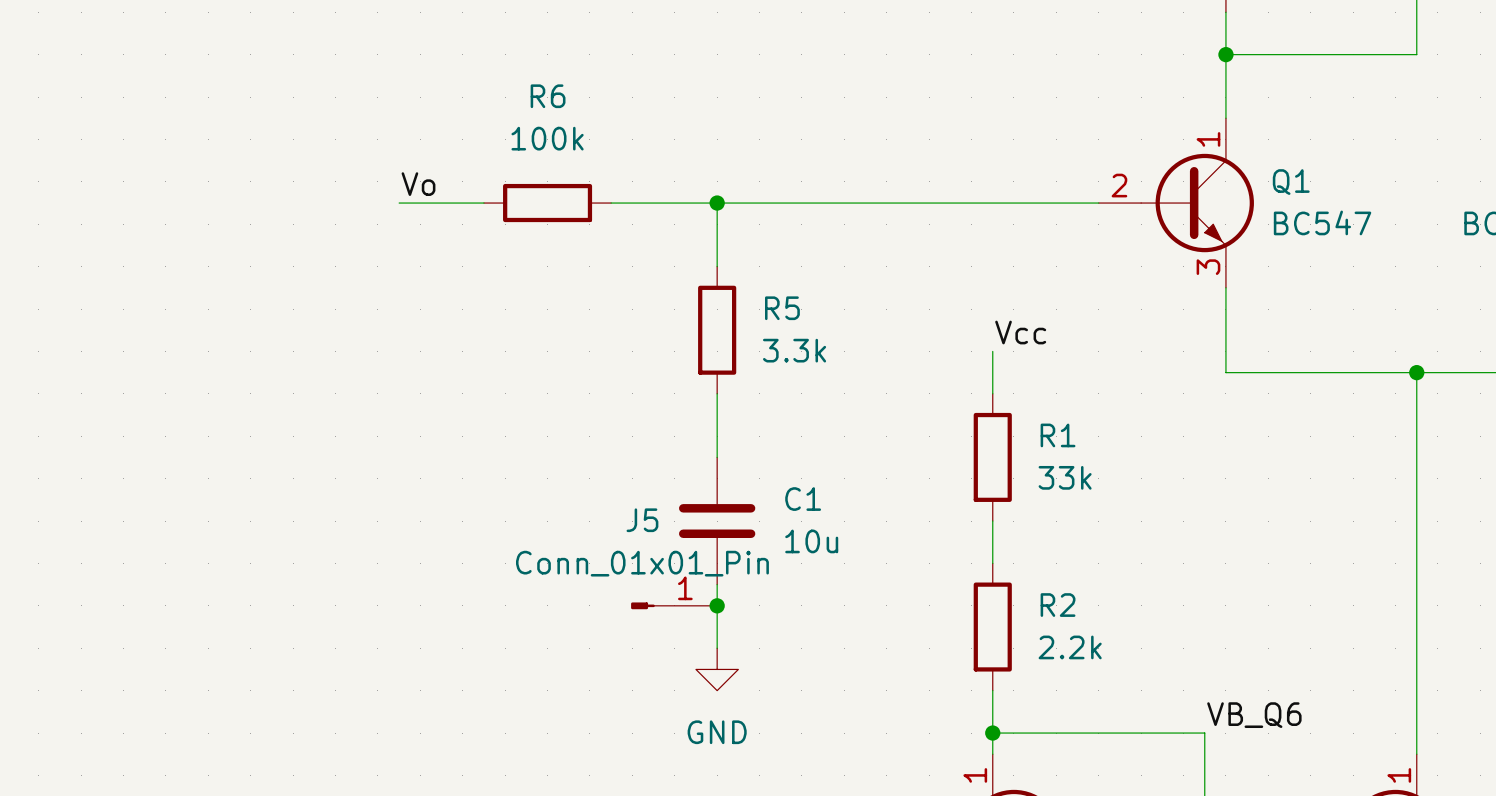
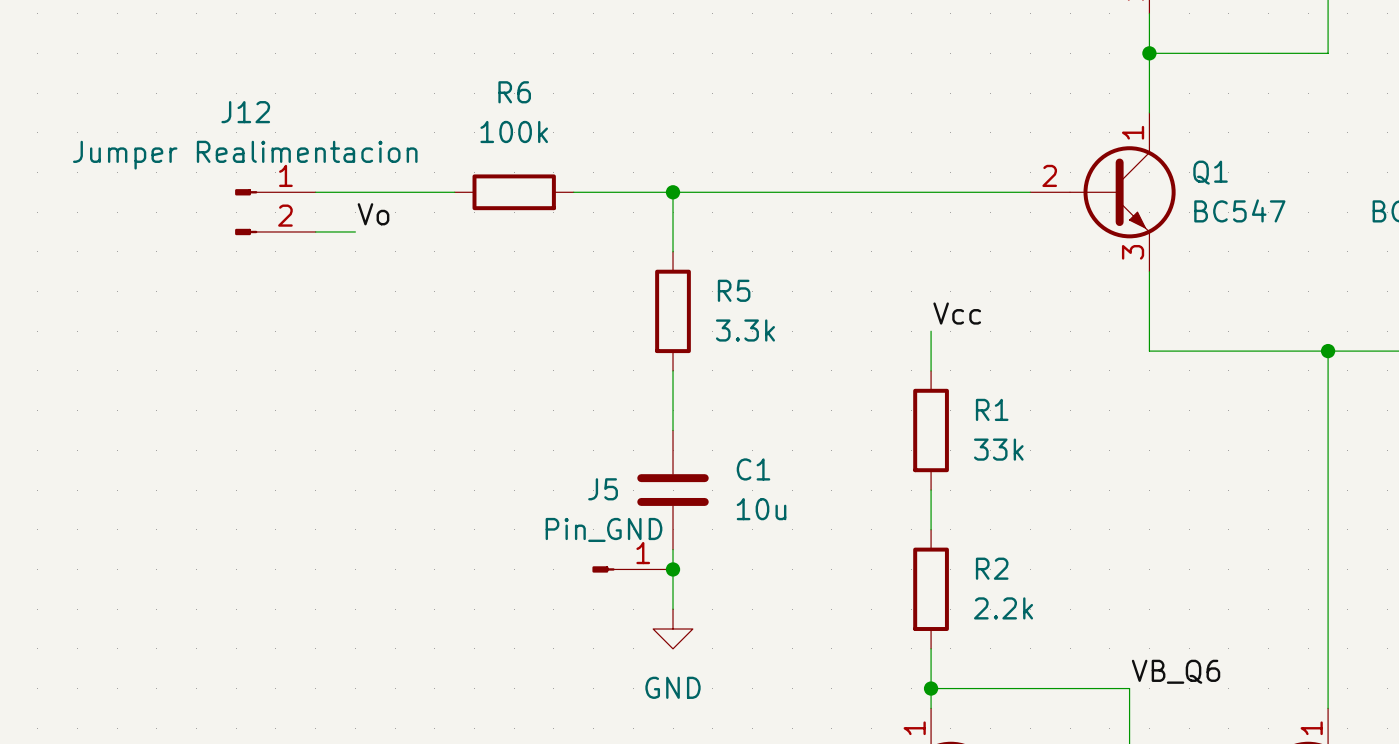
label position: Vo (418, 184) -> Vo (373, 214)
wire: none -> (315, 192) (375, 192)
J12: none -> Jumper Realimentacion (275, 212)
wire: none -> (315, 231) (355, 231)
J5 value: Conn_01x01_Pin (642, 563) -> Pin_GND (604, 529)

